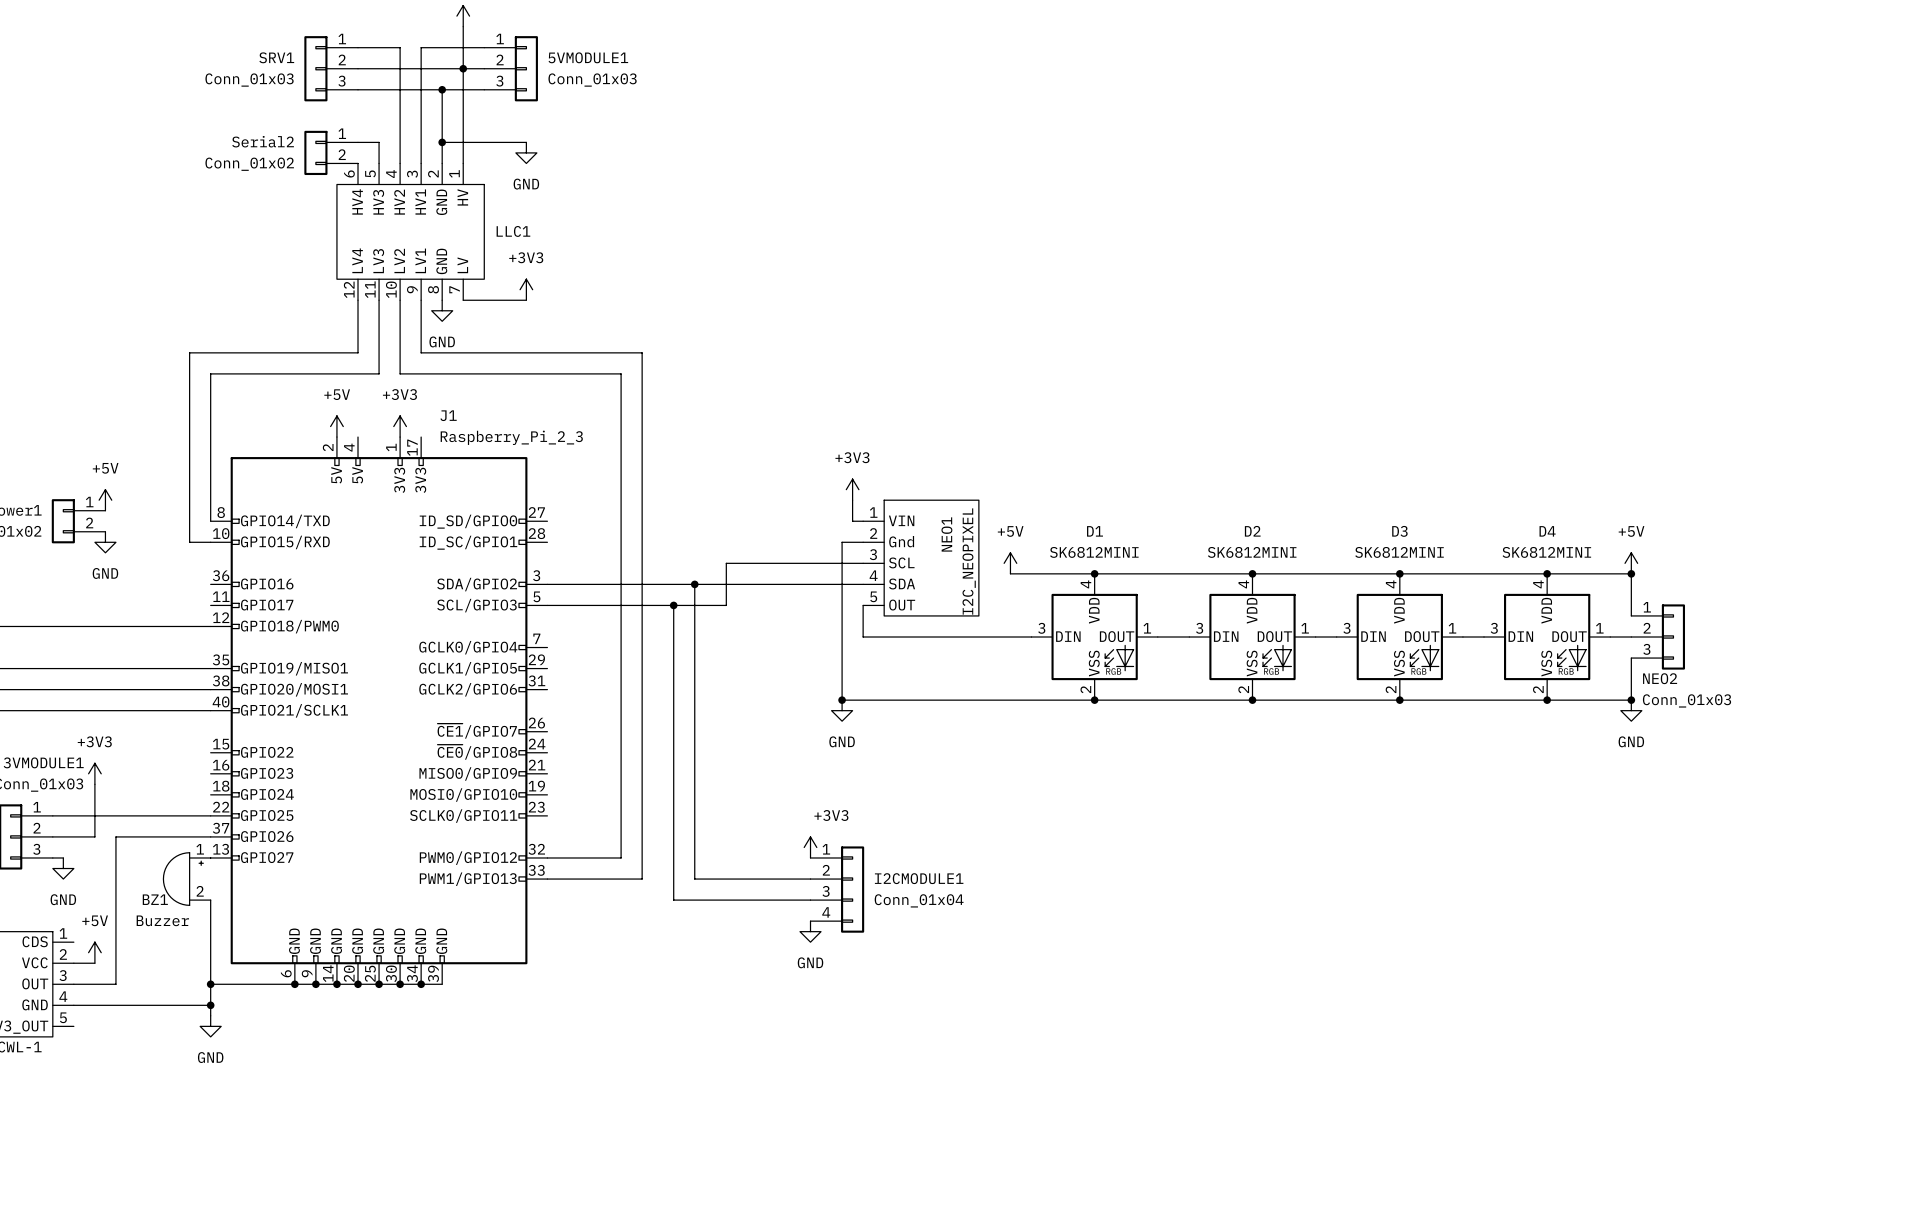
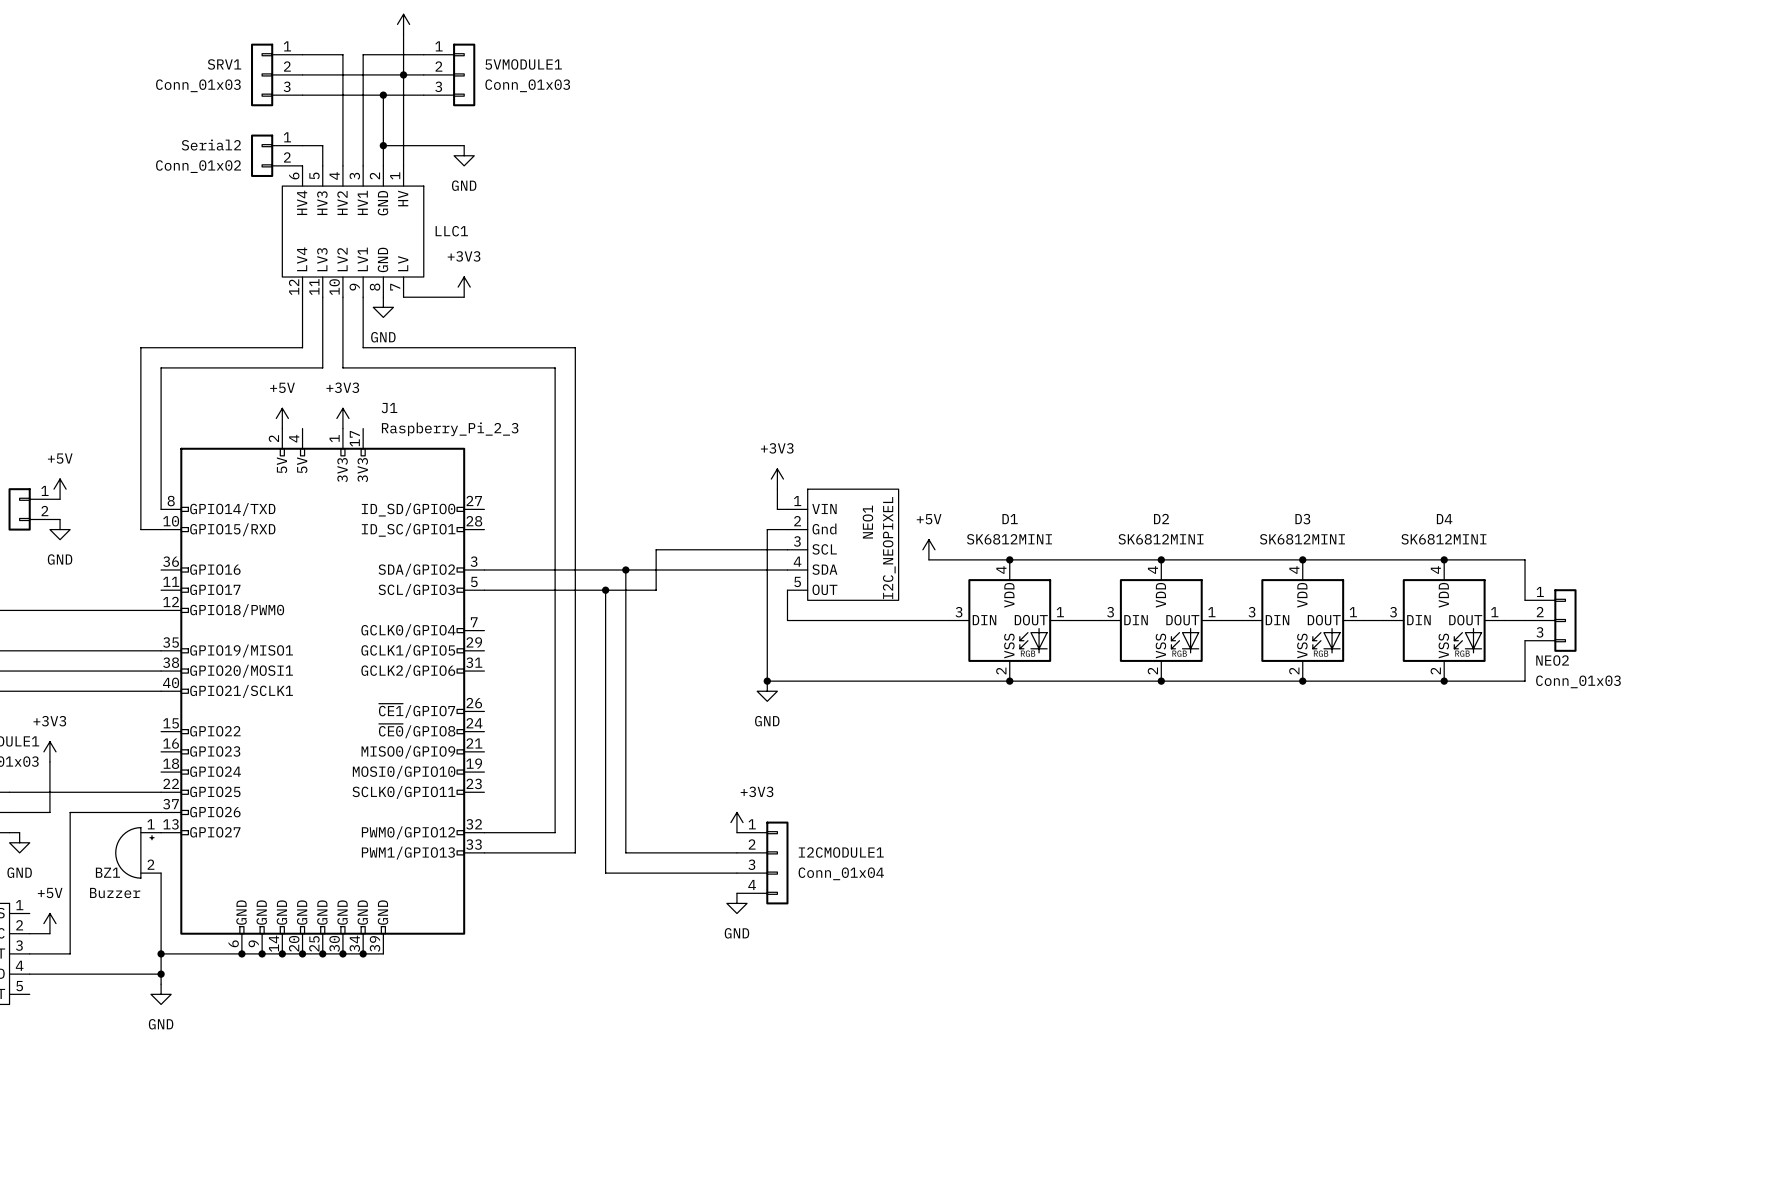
power symbol: +5V (1631, 563) -> none
junction: (1631, 573) -> none
junction: (1631, 700) -> none
power symbol: GND (1631, 710) -> none

